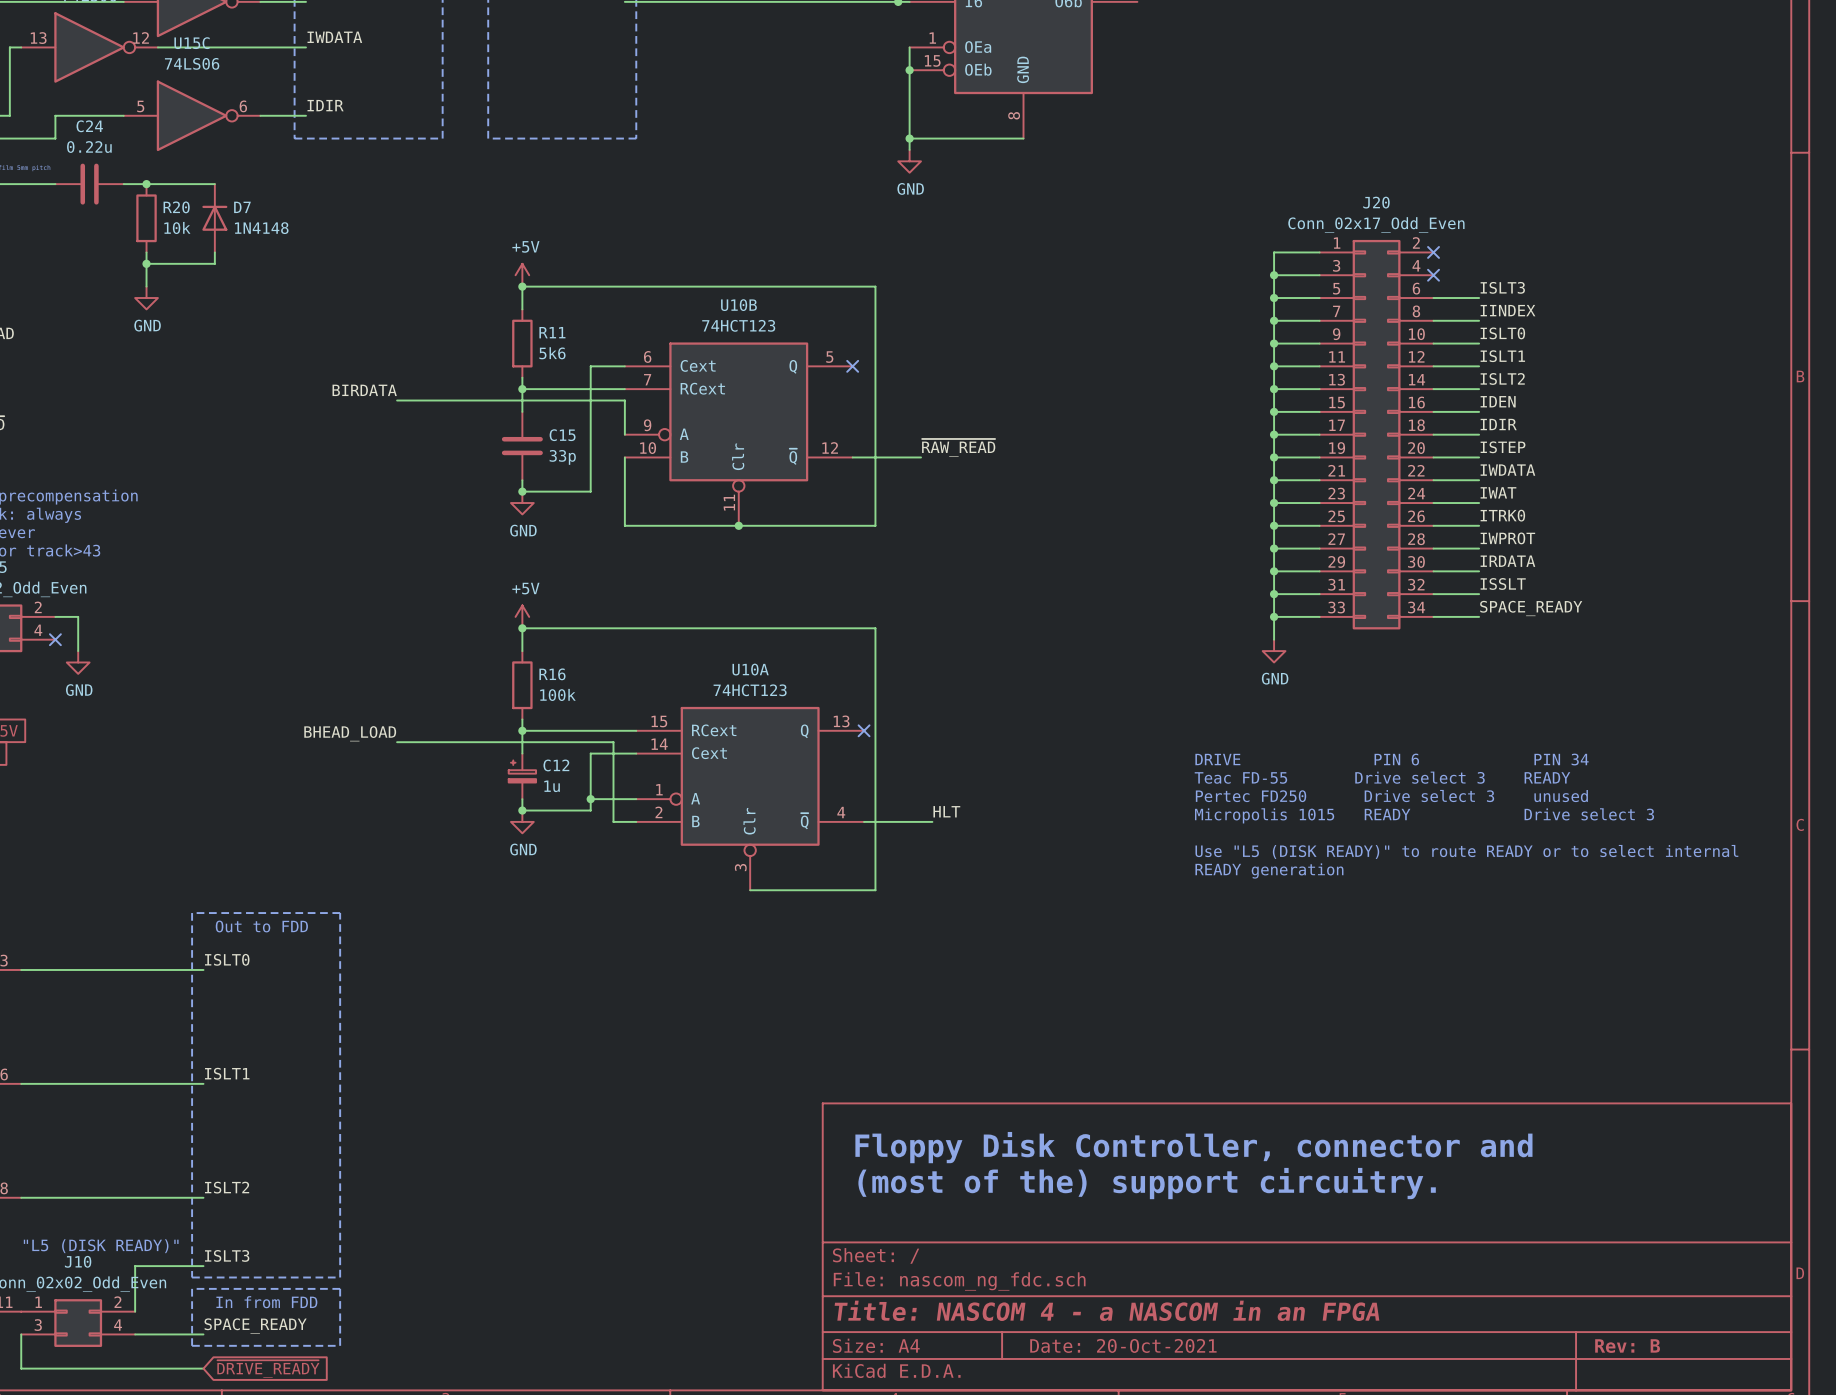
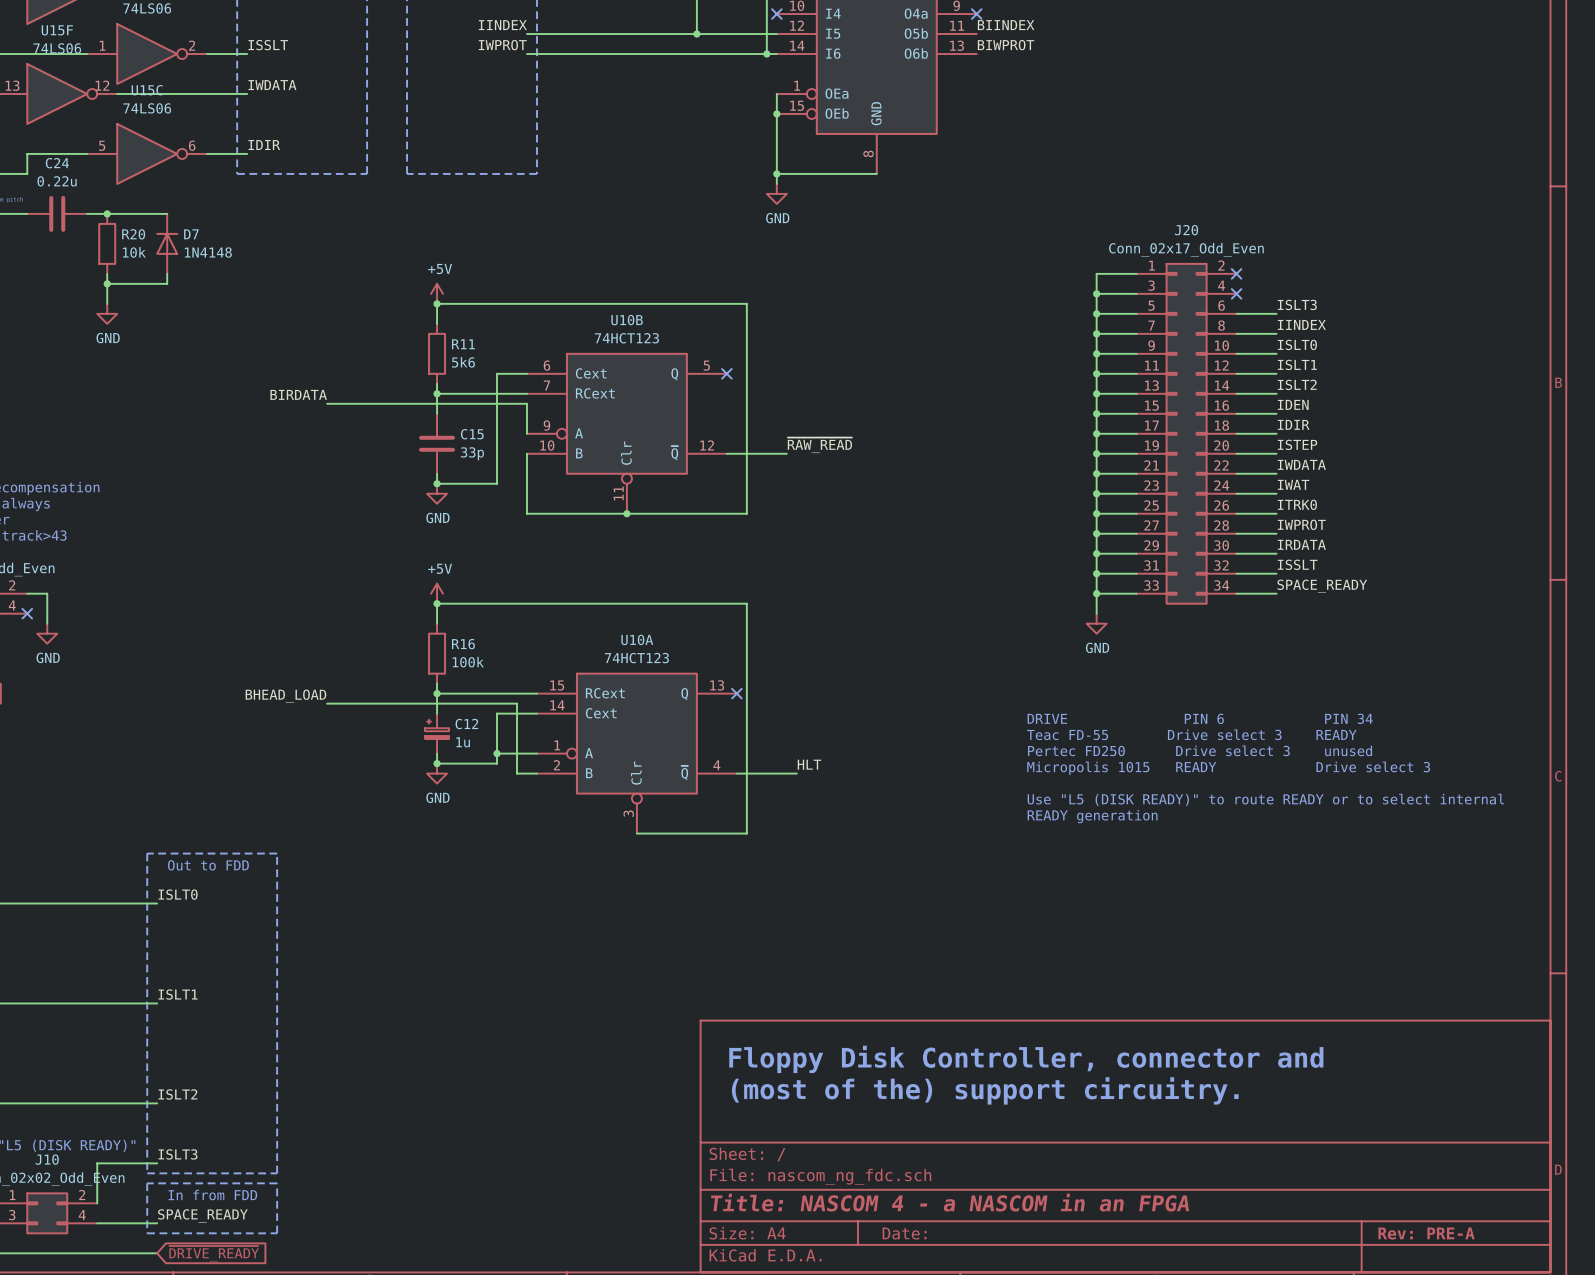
title block: Date: 20-Oct-2021 (1123, 1345) -> Date: (904, 1233)
title block: Rev: B (1627, 1346) -> Rev: PRE-A (1426, 1233)

